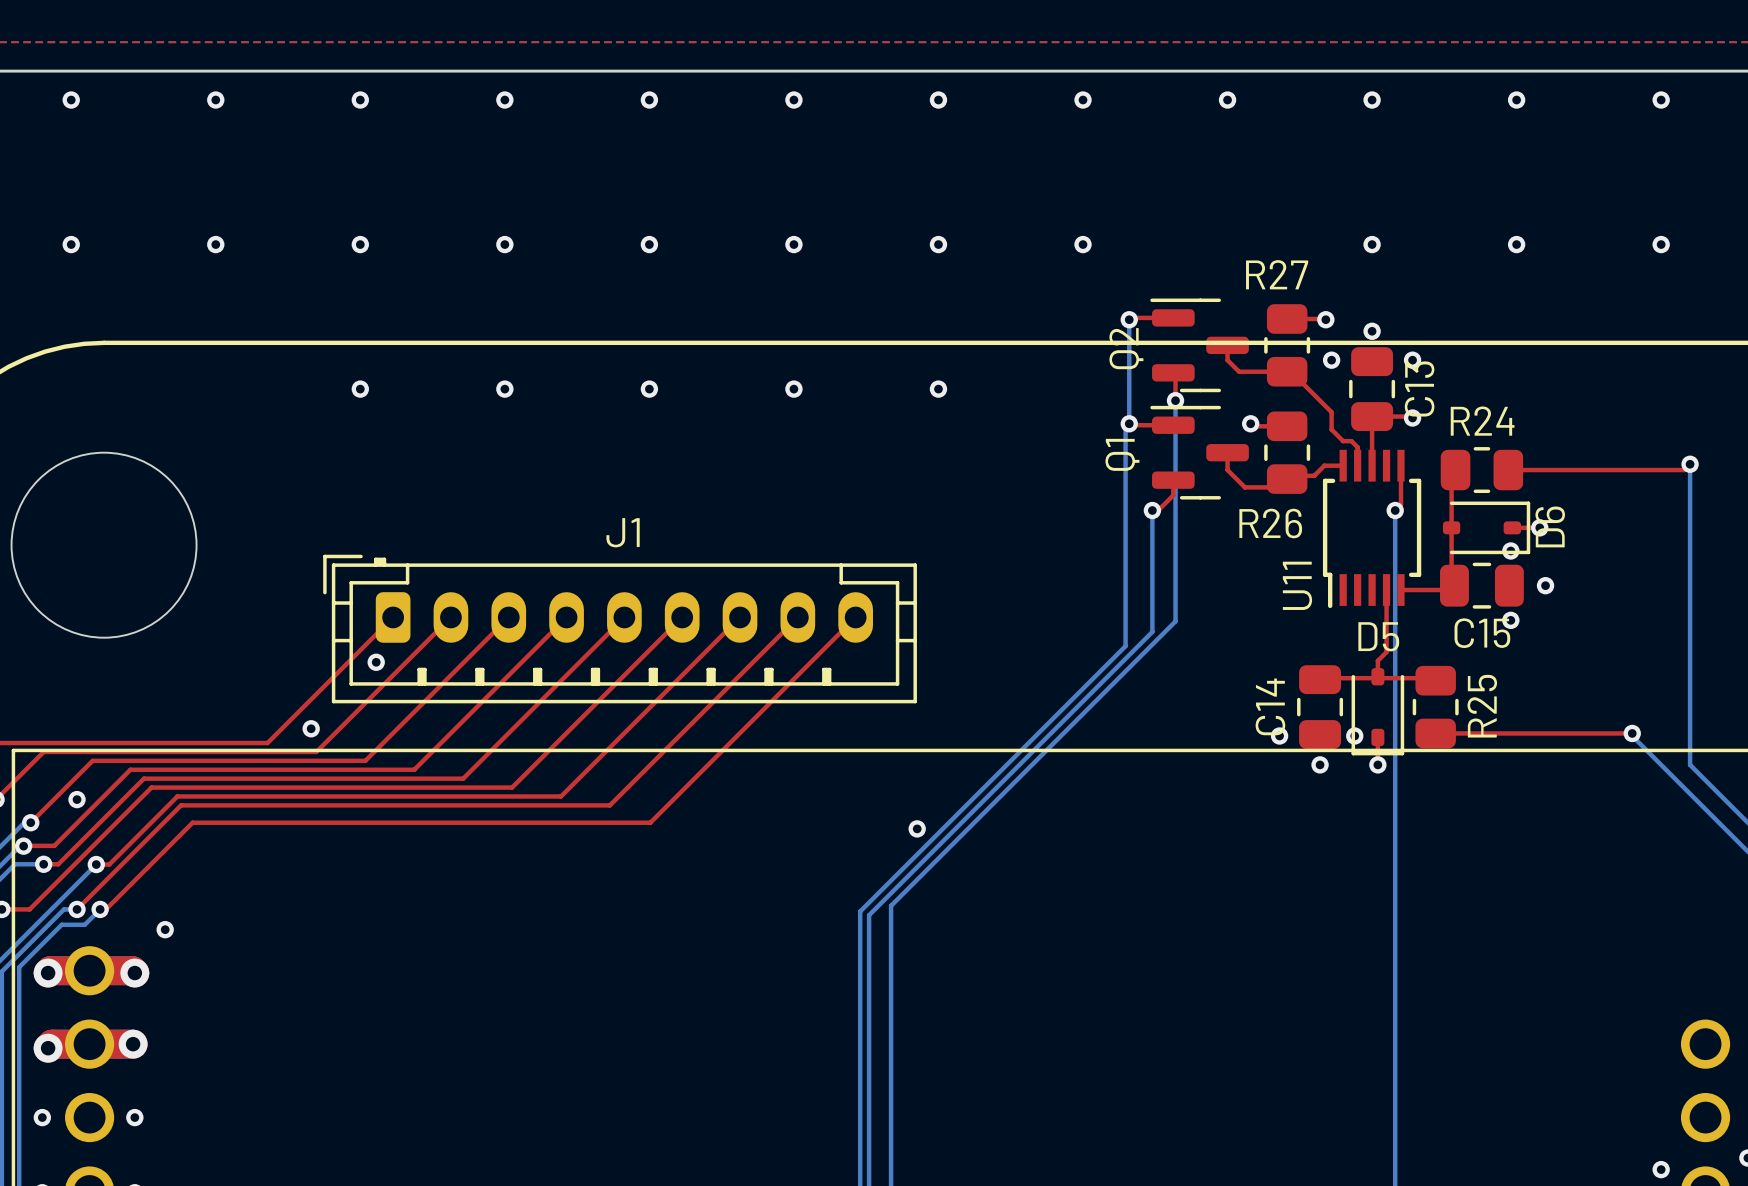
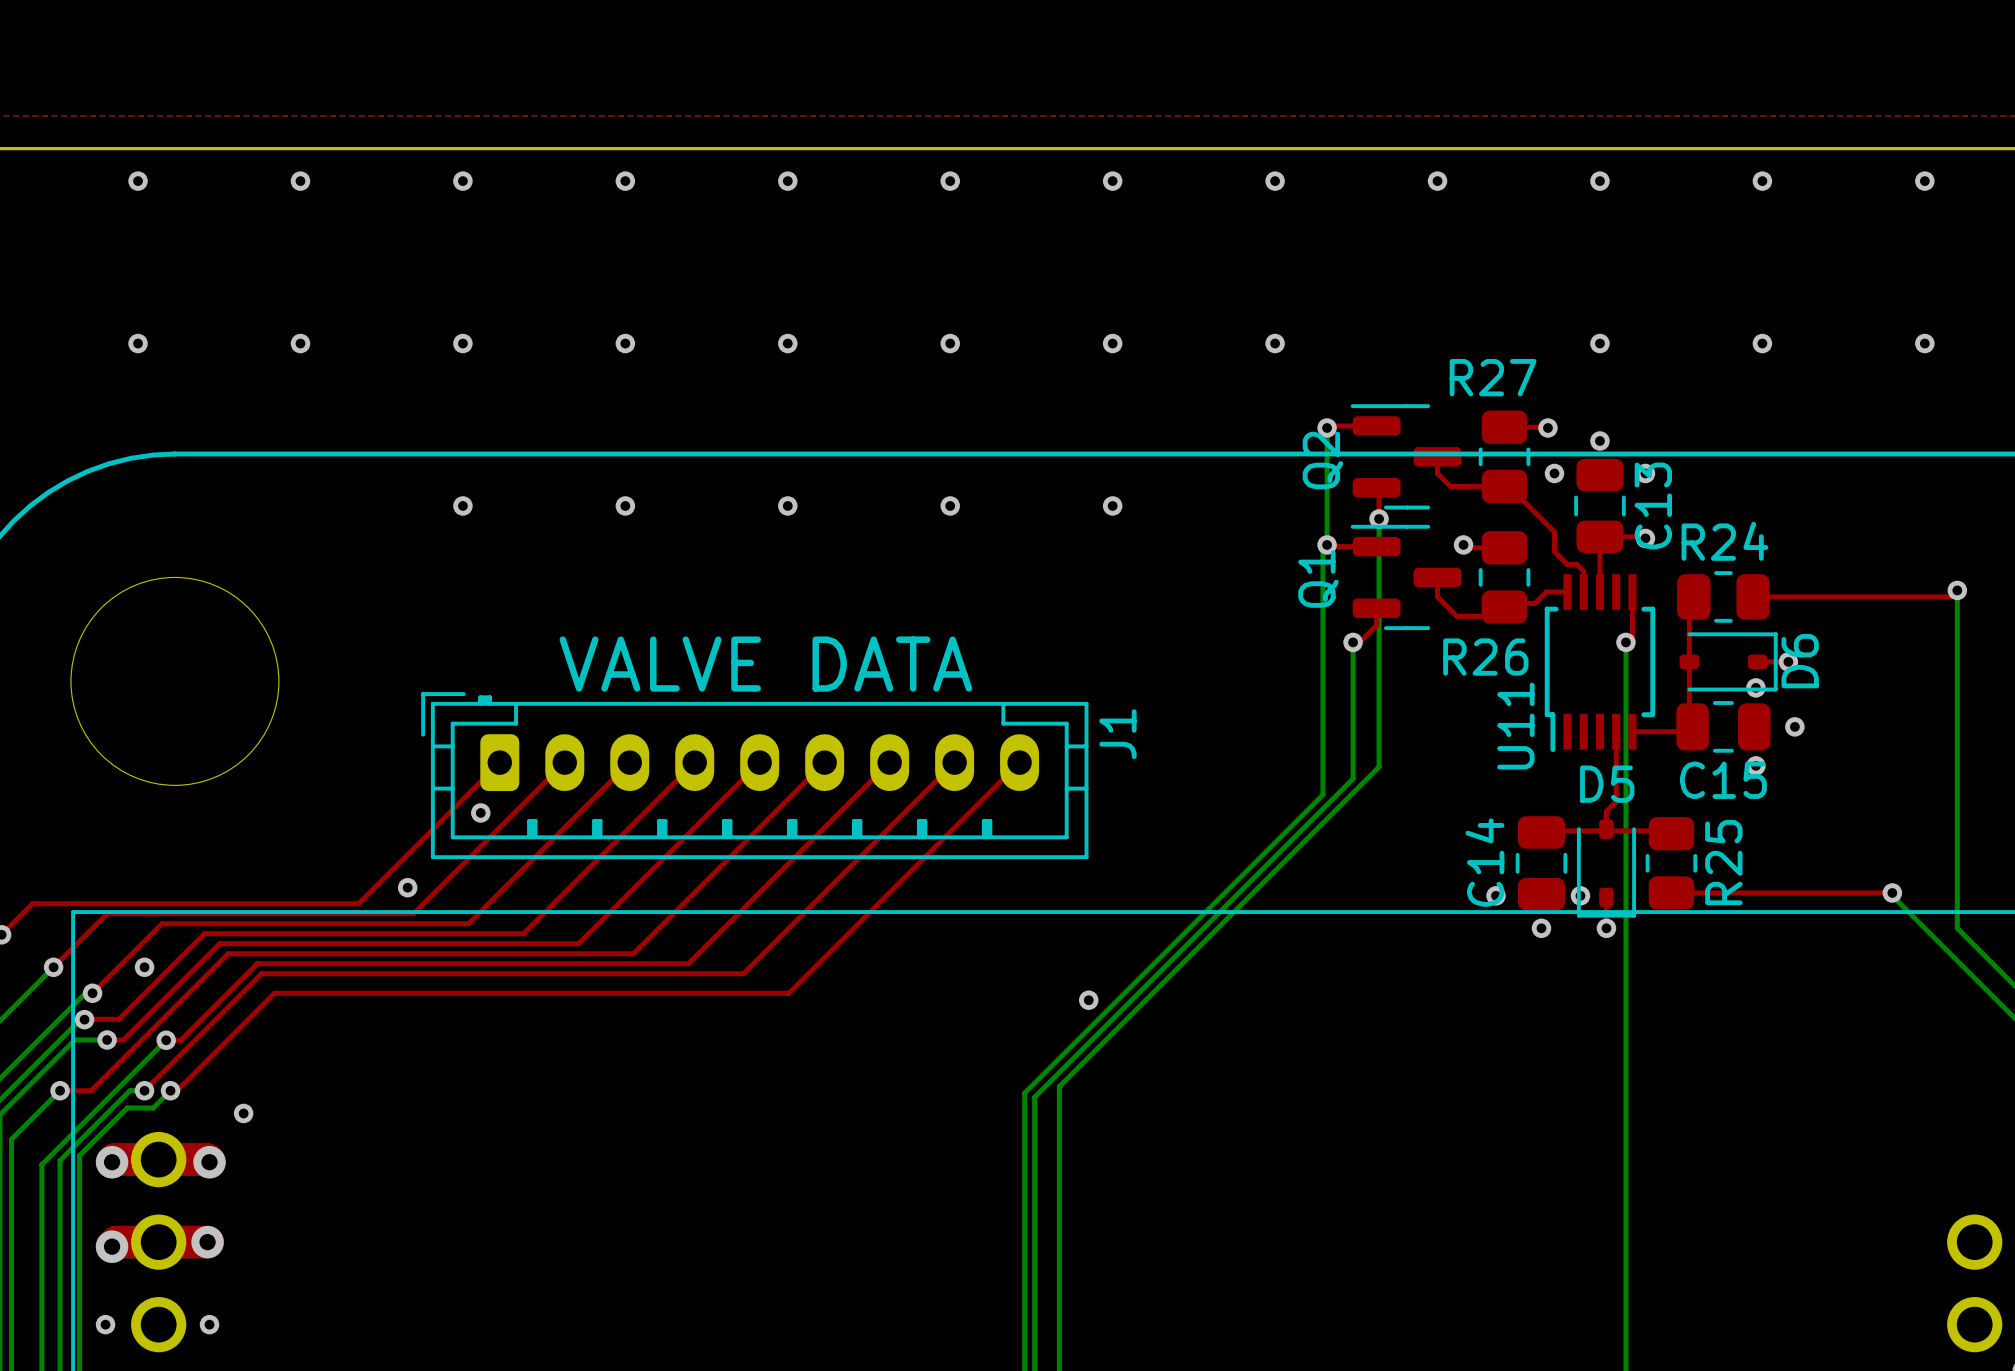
text: none -> VALVE DATA (765, 664)
J1 name rotation: 0° (623, 532) -> 90° counterclockwise (1117, 734)
J1 name position: J1 (623, 532) -> J1 (1117, 734)

